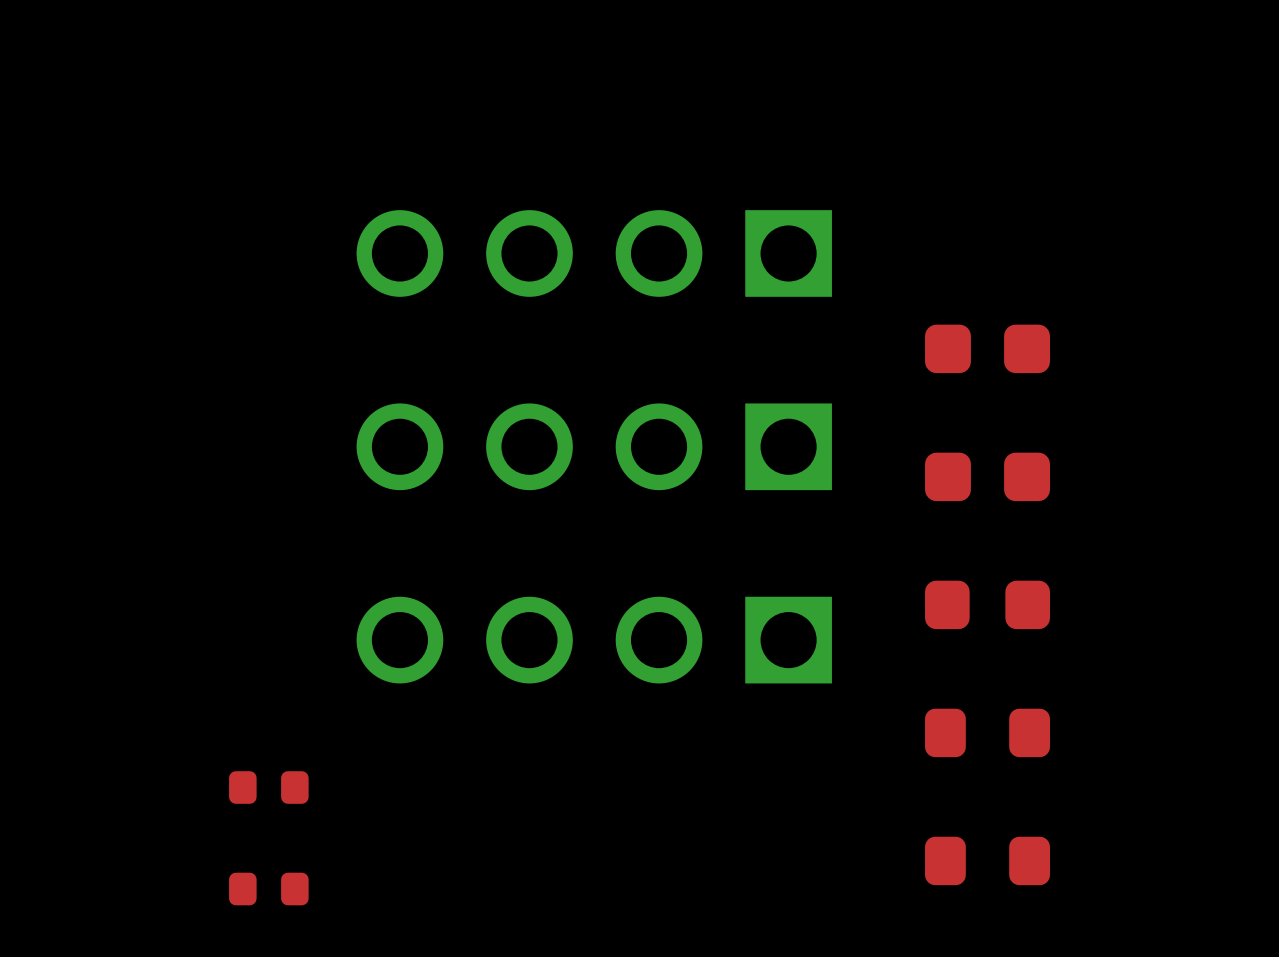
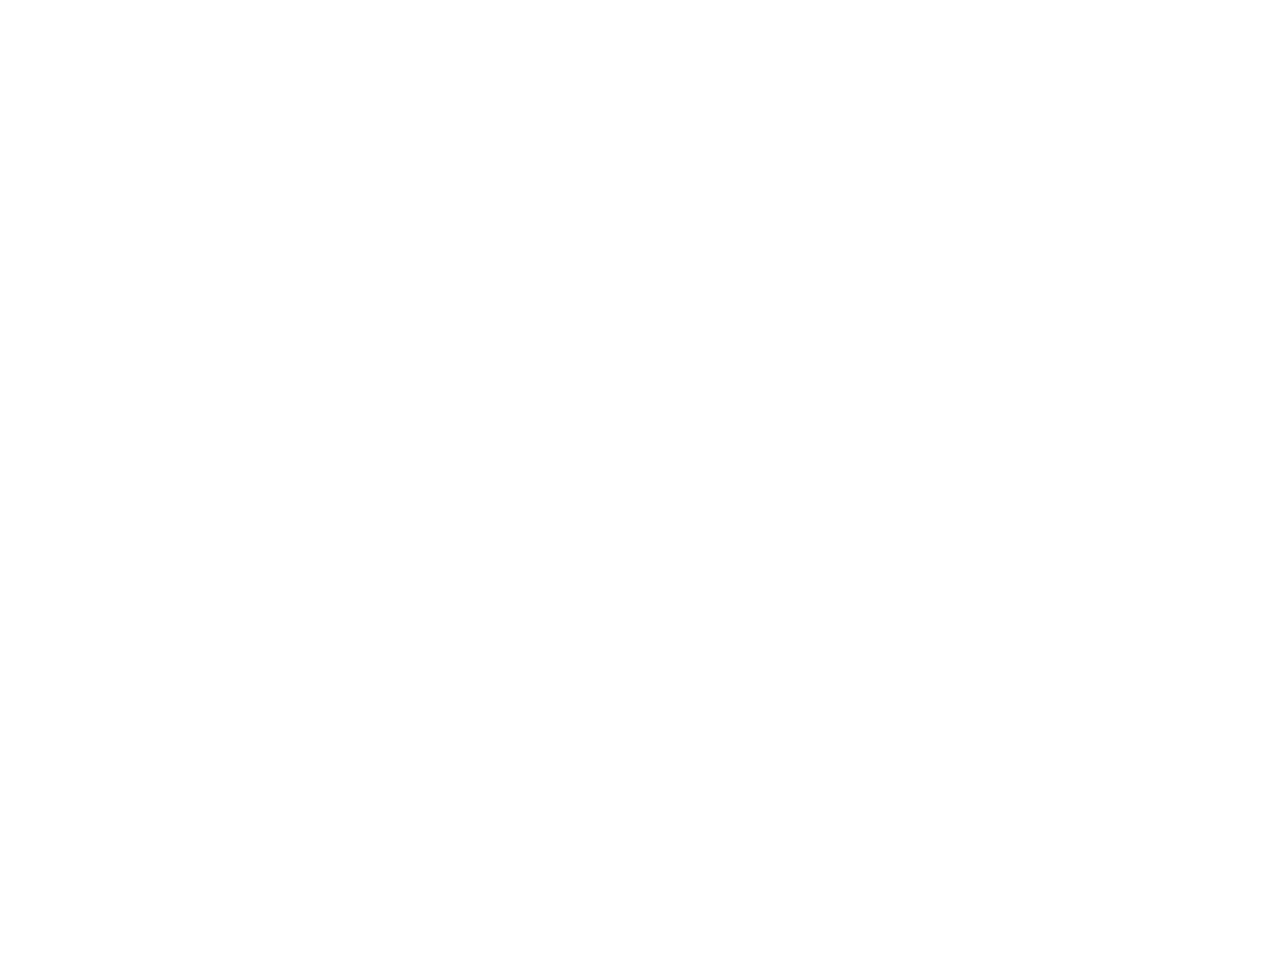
part: (594, 253) -> none
part: (987, 348) -> none
part: (594, 446) -> none
part: (987, 476) -> none
part: (987, 604) -> none
part: (594, 640) -> none
part: (987, 732) -> none
part: (268, 787) -> none
part: (987, 860) -> none
part: (268, 889) -> none

